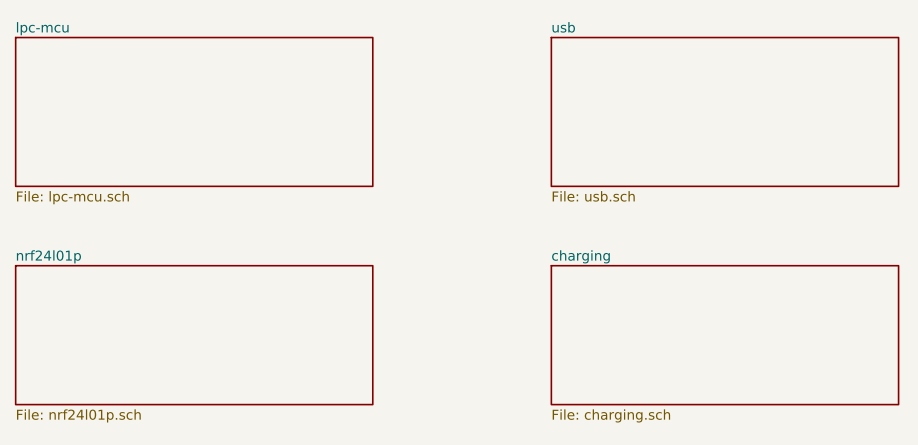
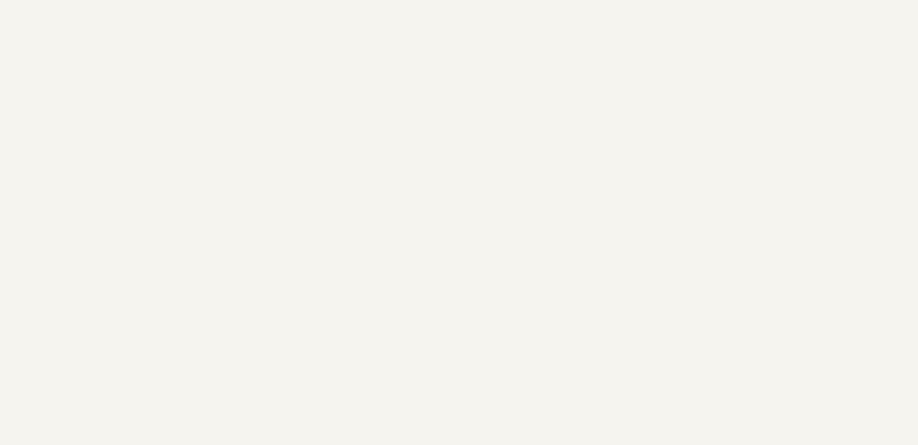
sheet lpc-mcu: File: lpc-mcu.sch (194, 111) -> none
sheet usb: File: usb.sch (724, 111) -> none
sheet nrf24l01p: File: nrf24l01p.sch (194, 335) -> none
sheet charging: File: charging.sch (724, 335) -> none

